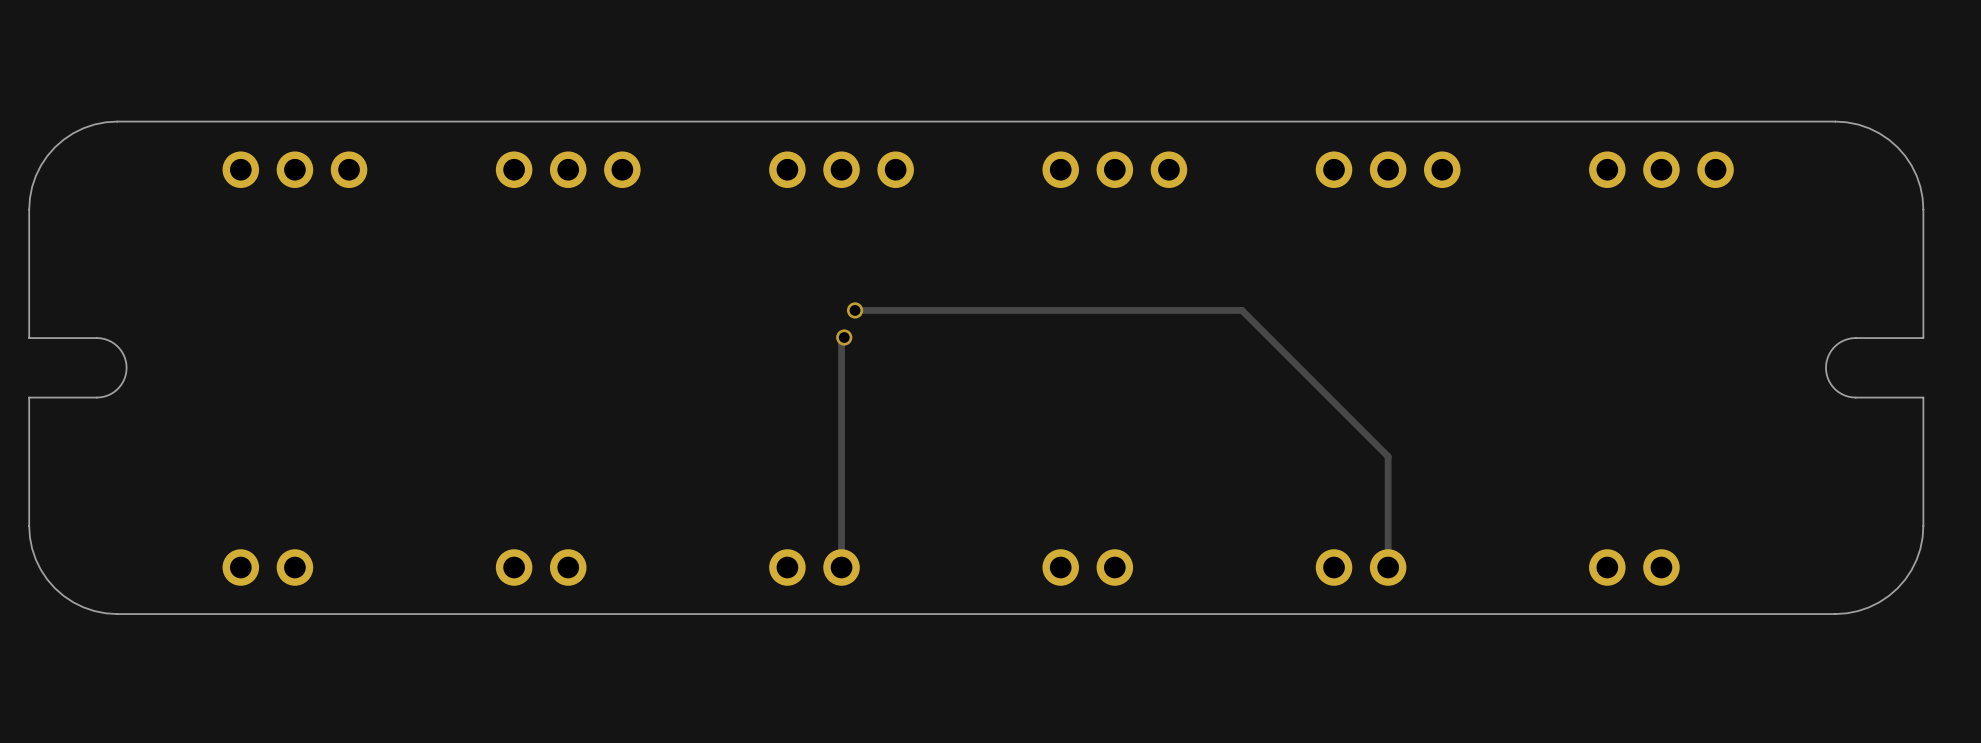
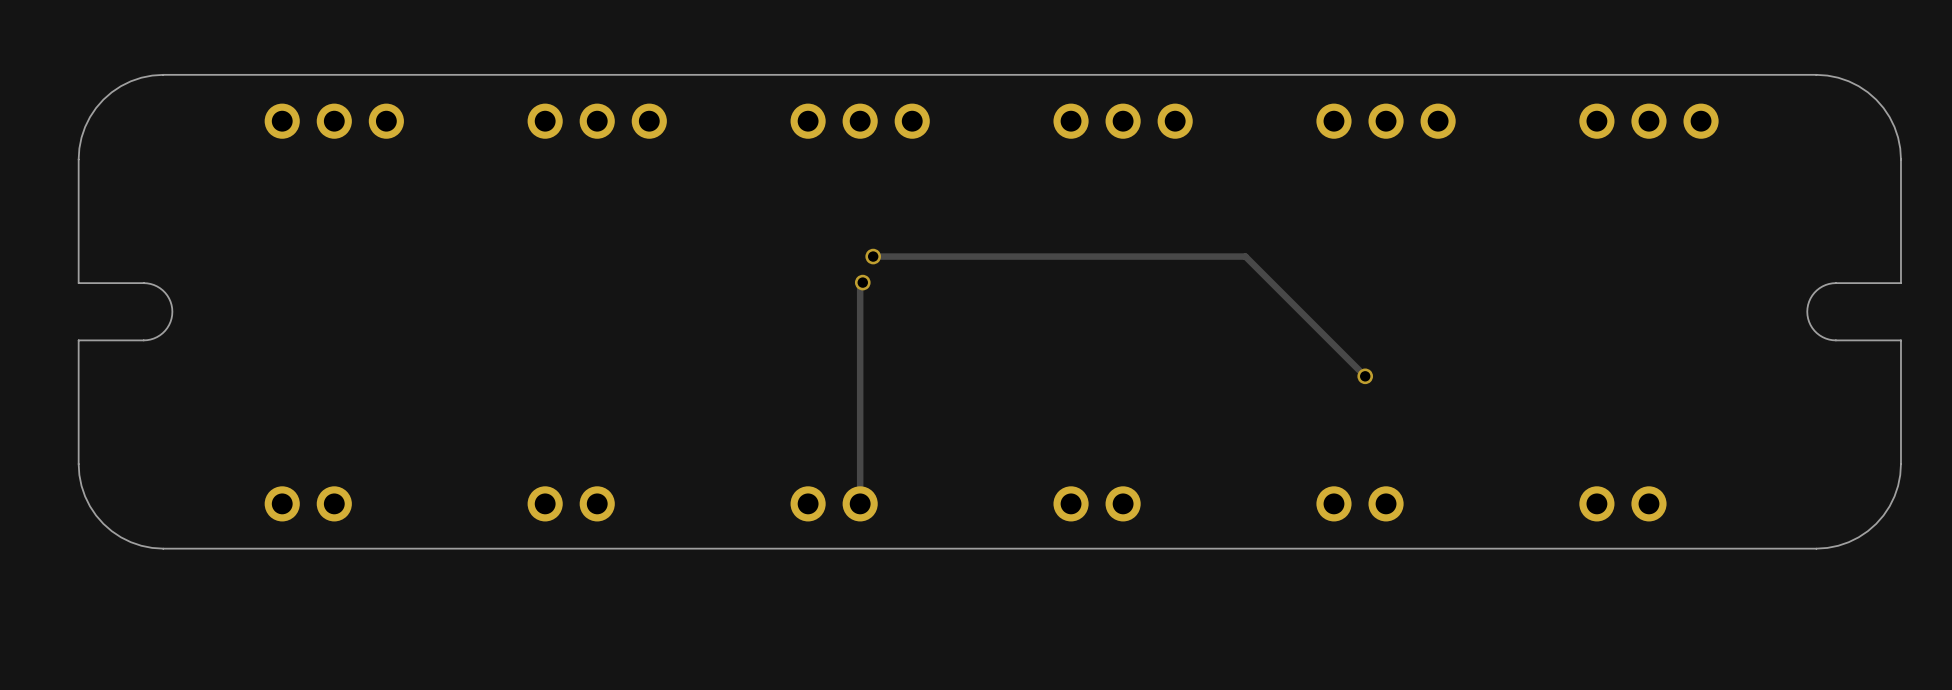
track: (1366, 434) (1388, 456) (1388, 567) -> none
via: none -> (1365, 376)

